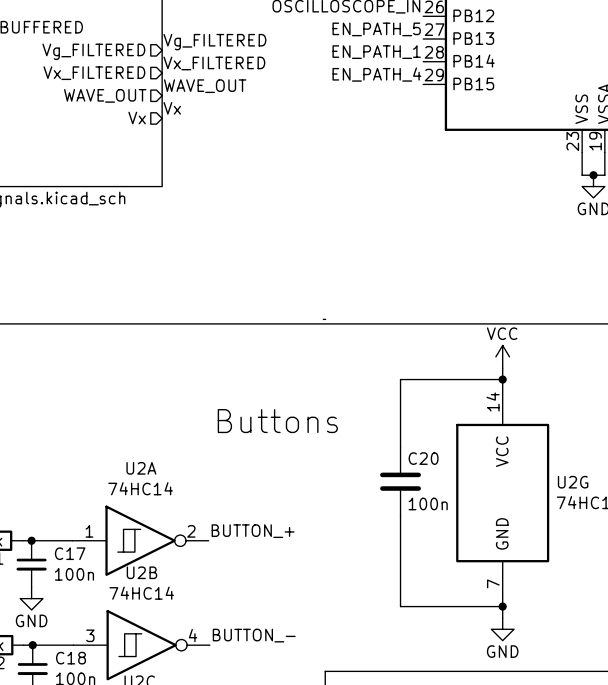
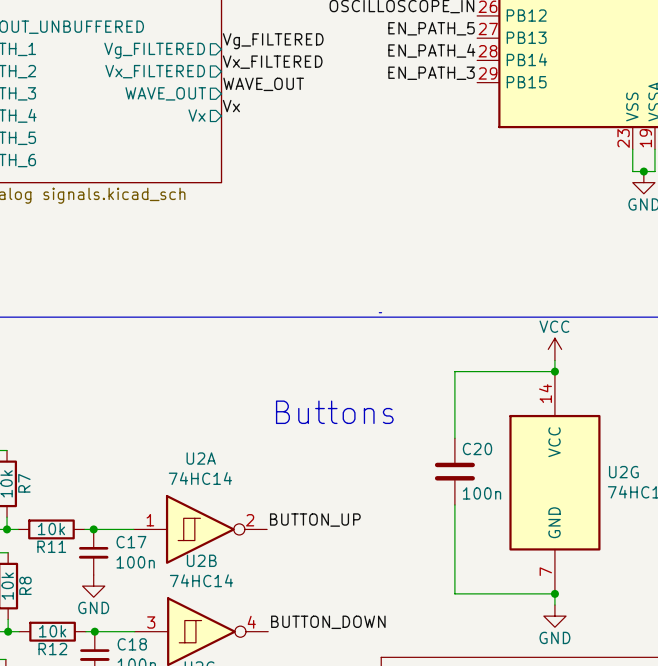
label: EN_PATH_1 (376, 52) -> EN_PATH_4 (431, 50)
label: EN_PATH_4 (376, 74) -> EN_PATH_3 (431, 73)
label: BUTTON_+ (253, 531) -> BUTTON_UP (315, 520)
label: BUTTON_- (254, 635) -> BUTTON_DOWN (328, 622)

